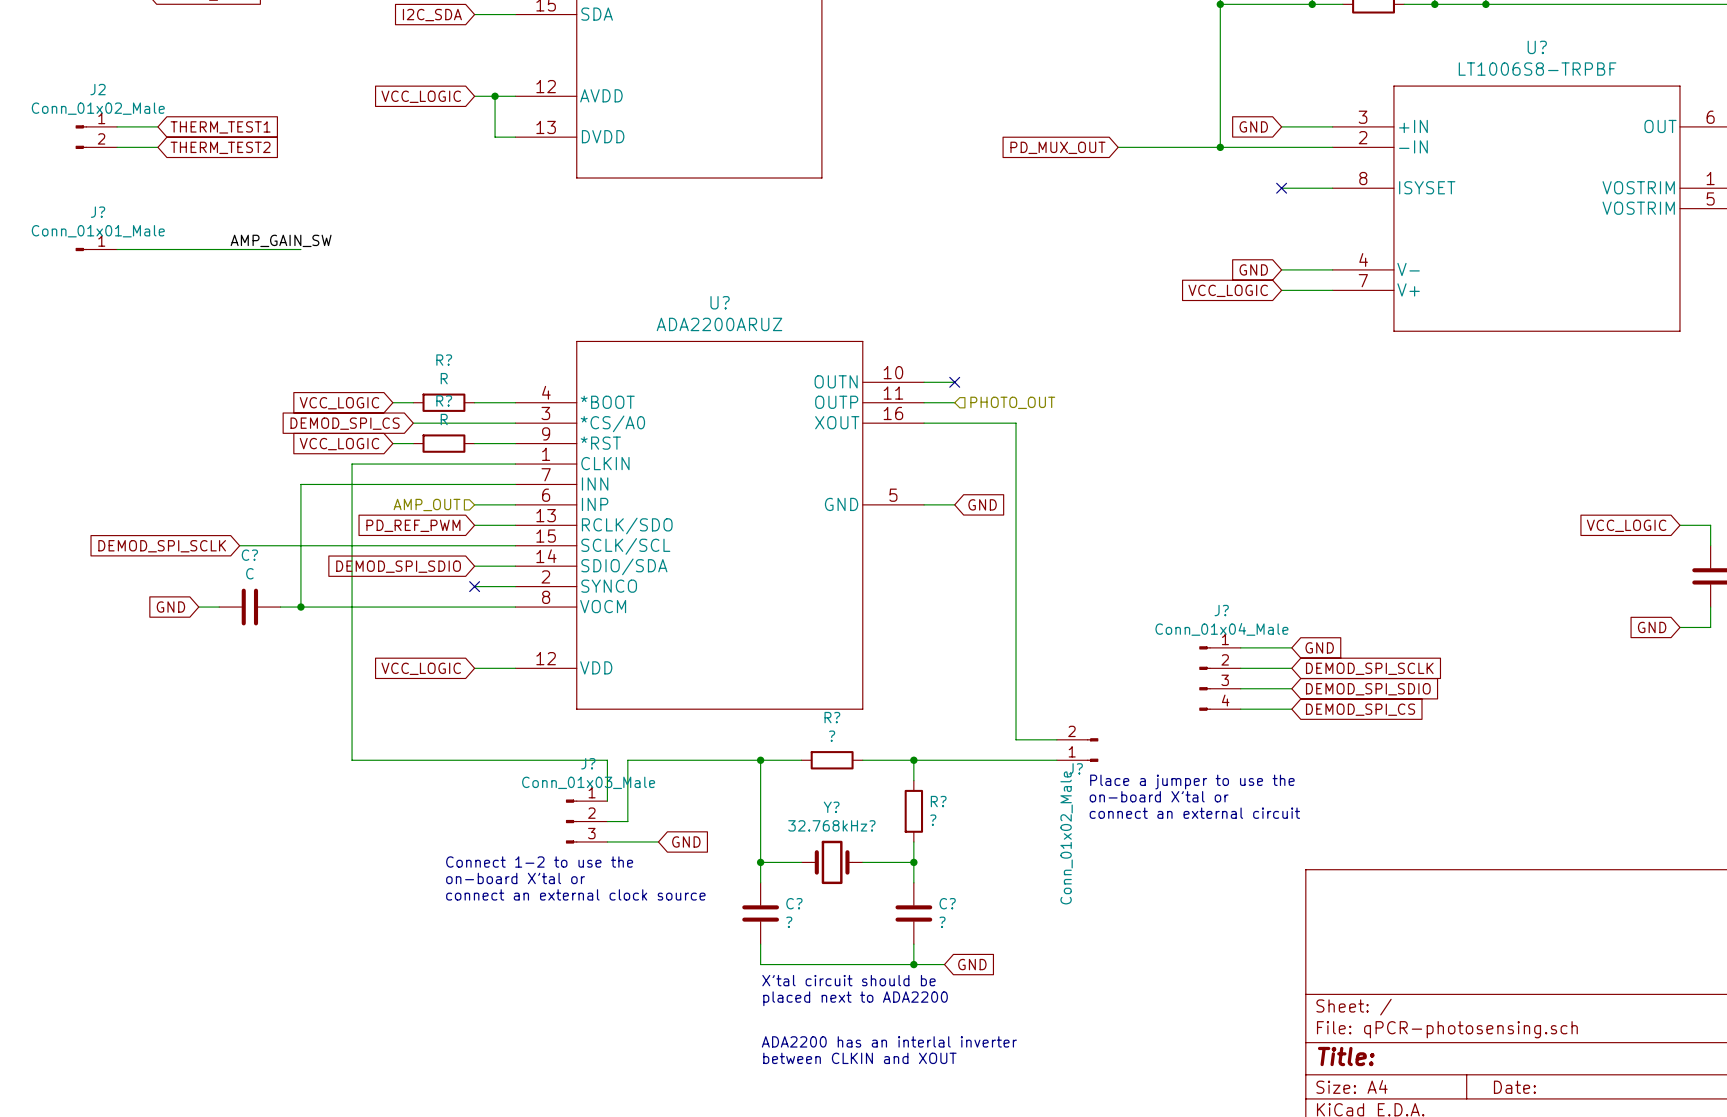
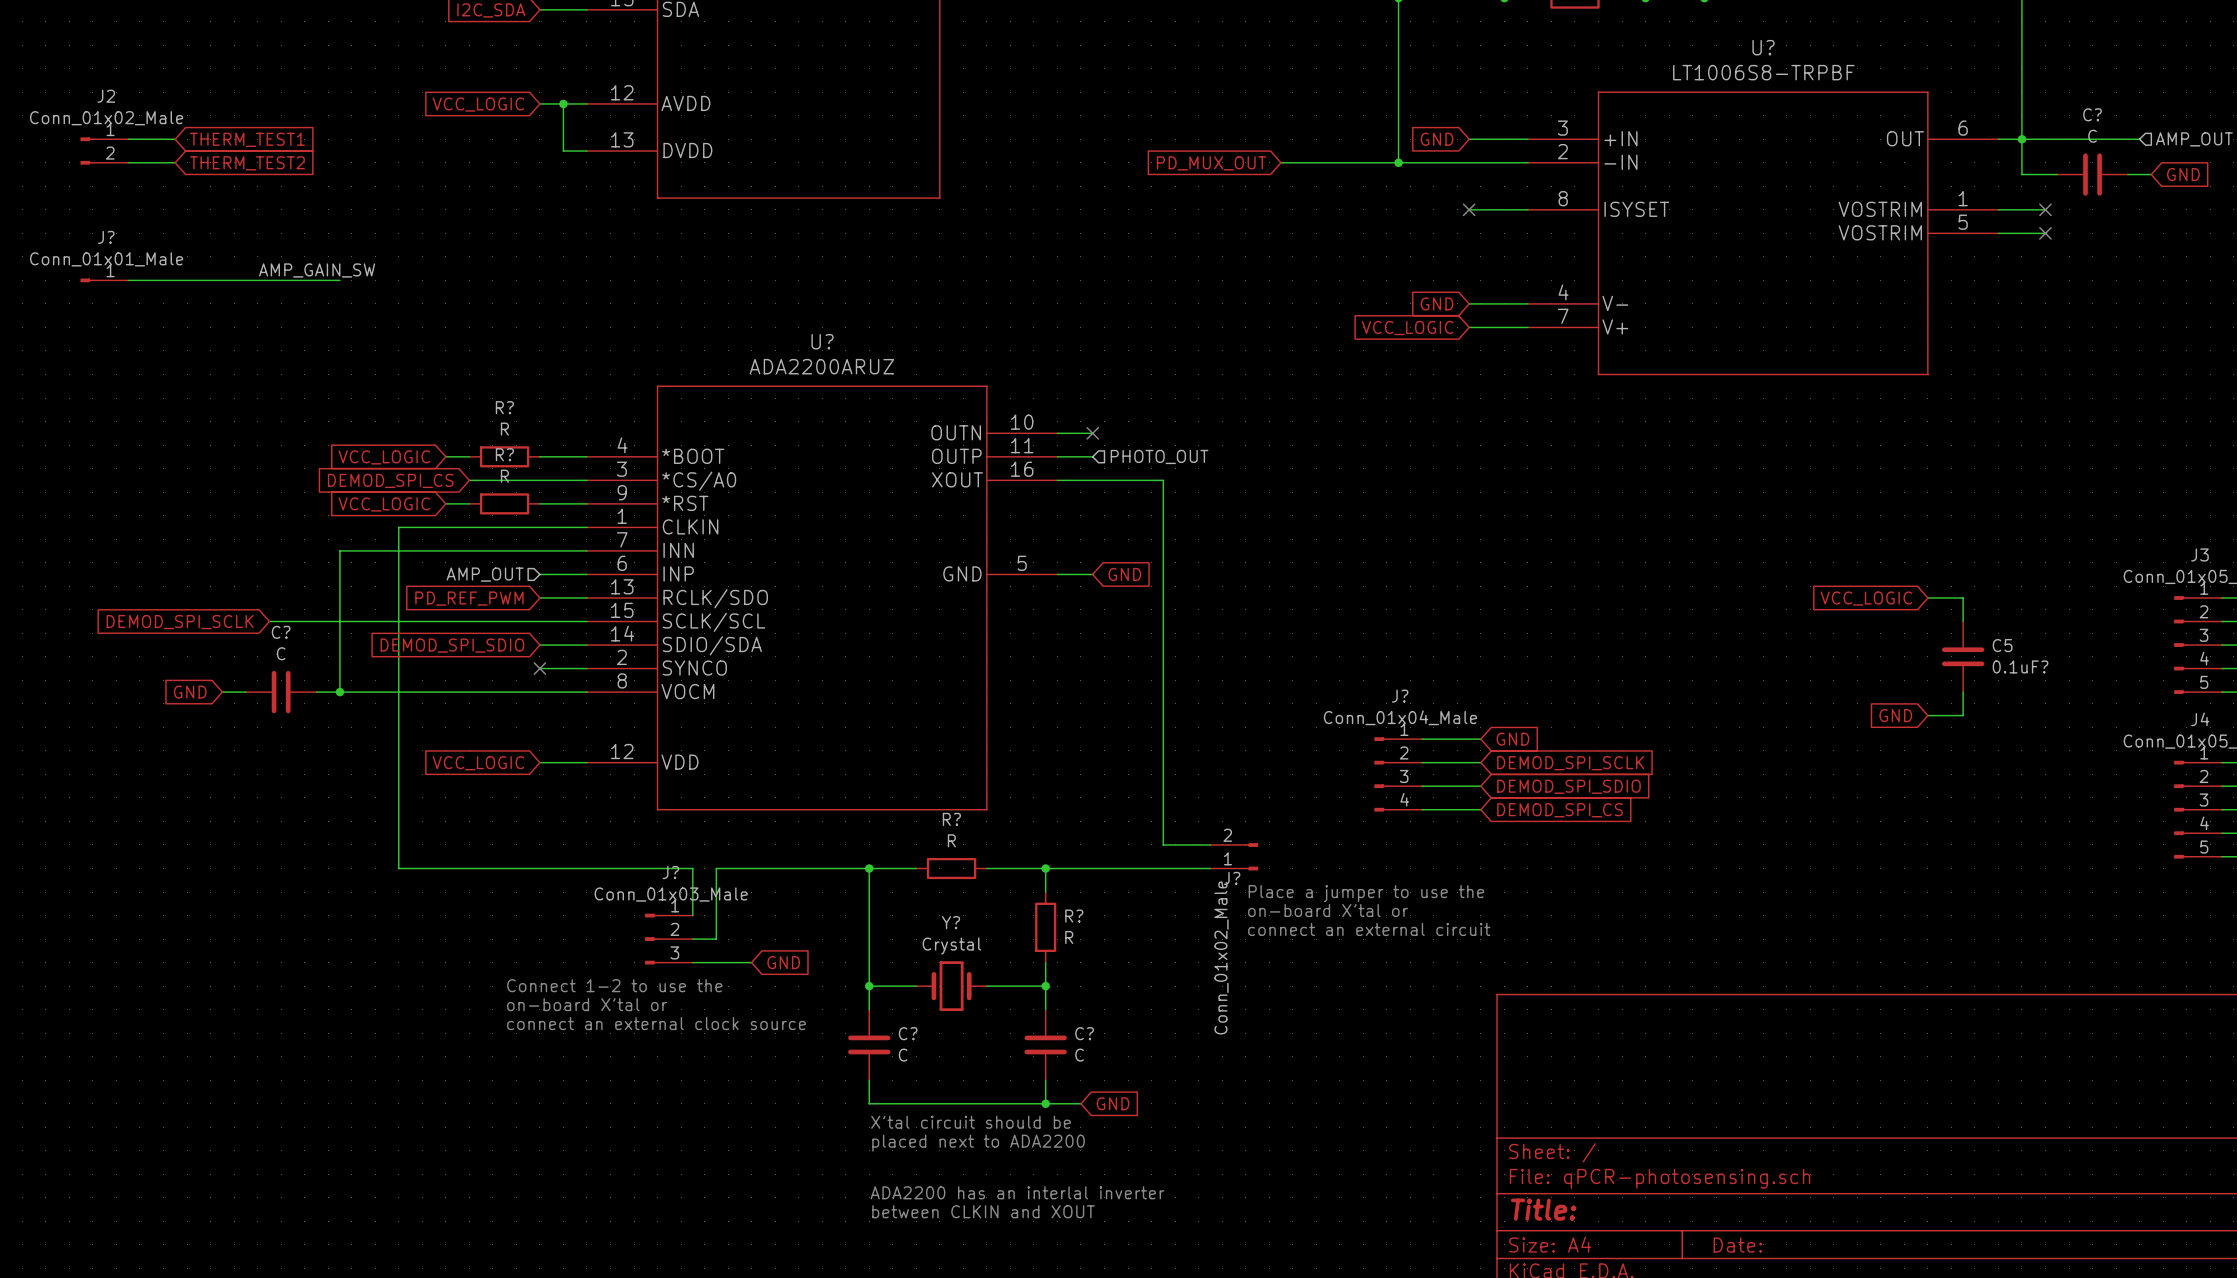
R? value: ? (832, 736) -> R (951, 840)
R? value: ? (933, 820) -> R (1069, 937)
Y? value: 32.768kHz? (831, 825) -> Crystal (951, 946)
C? value: ? (789, 922) -> C (903, 1055)
C? value: ? (942, 922) -> C (1079, 1055)

